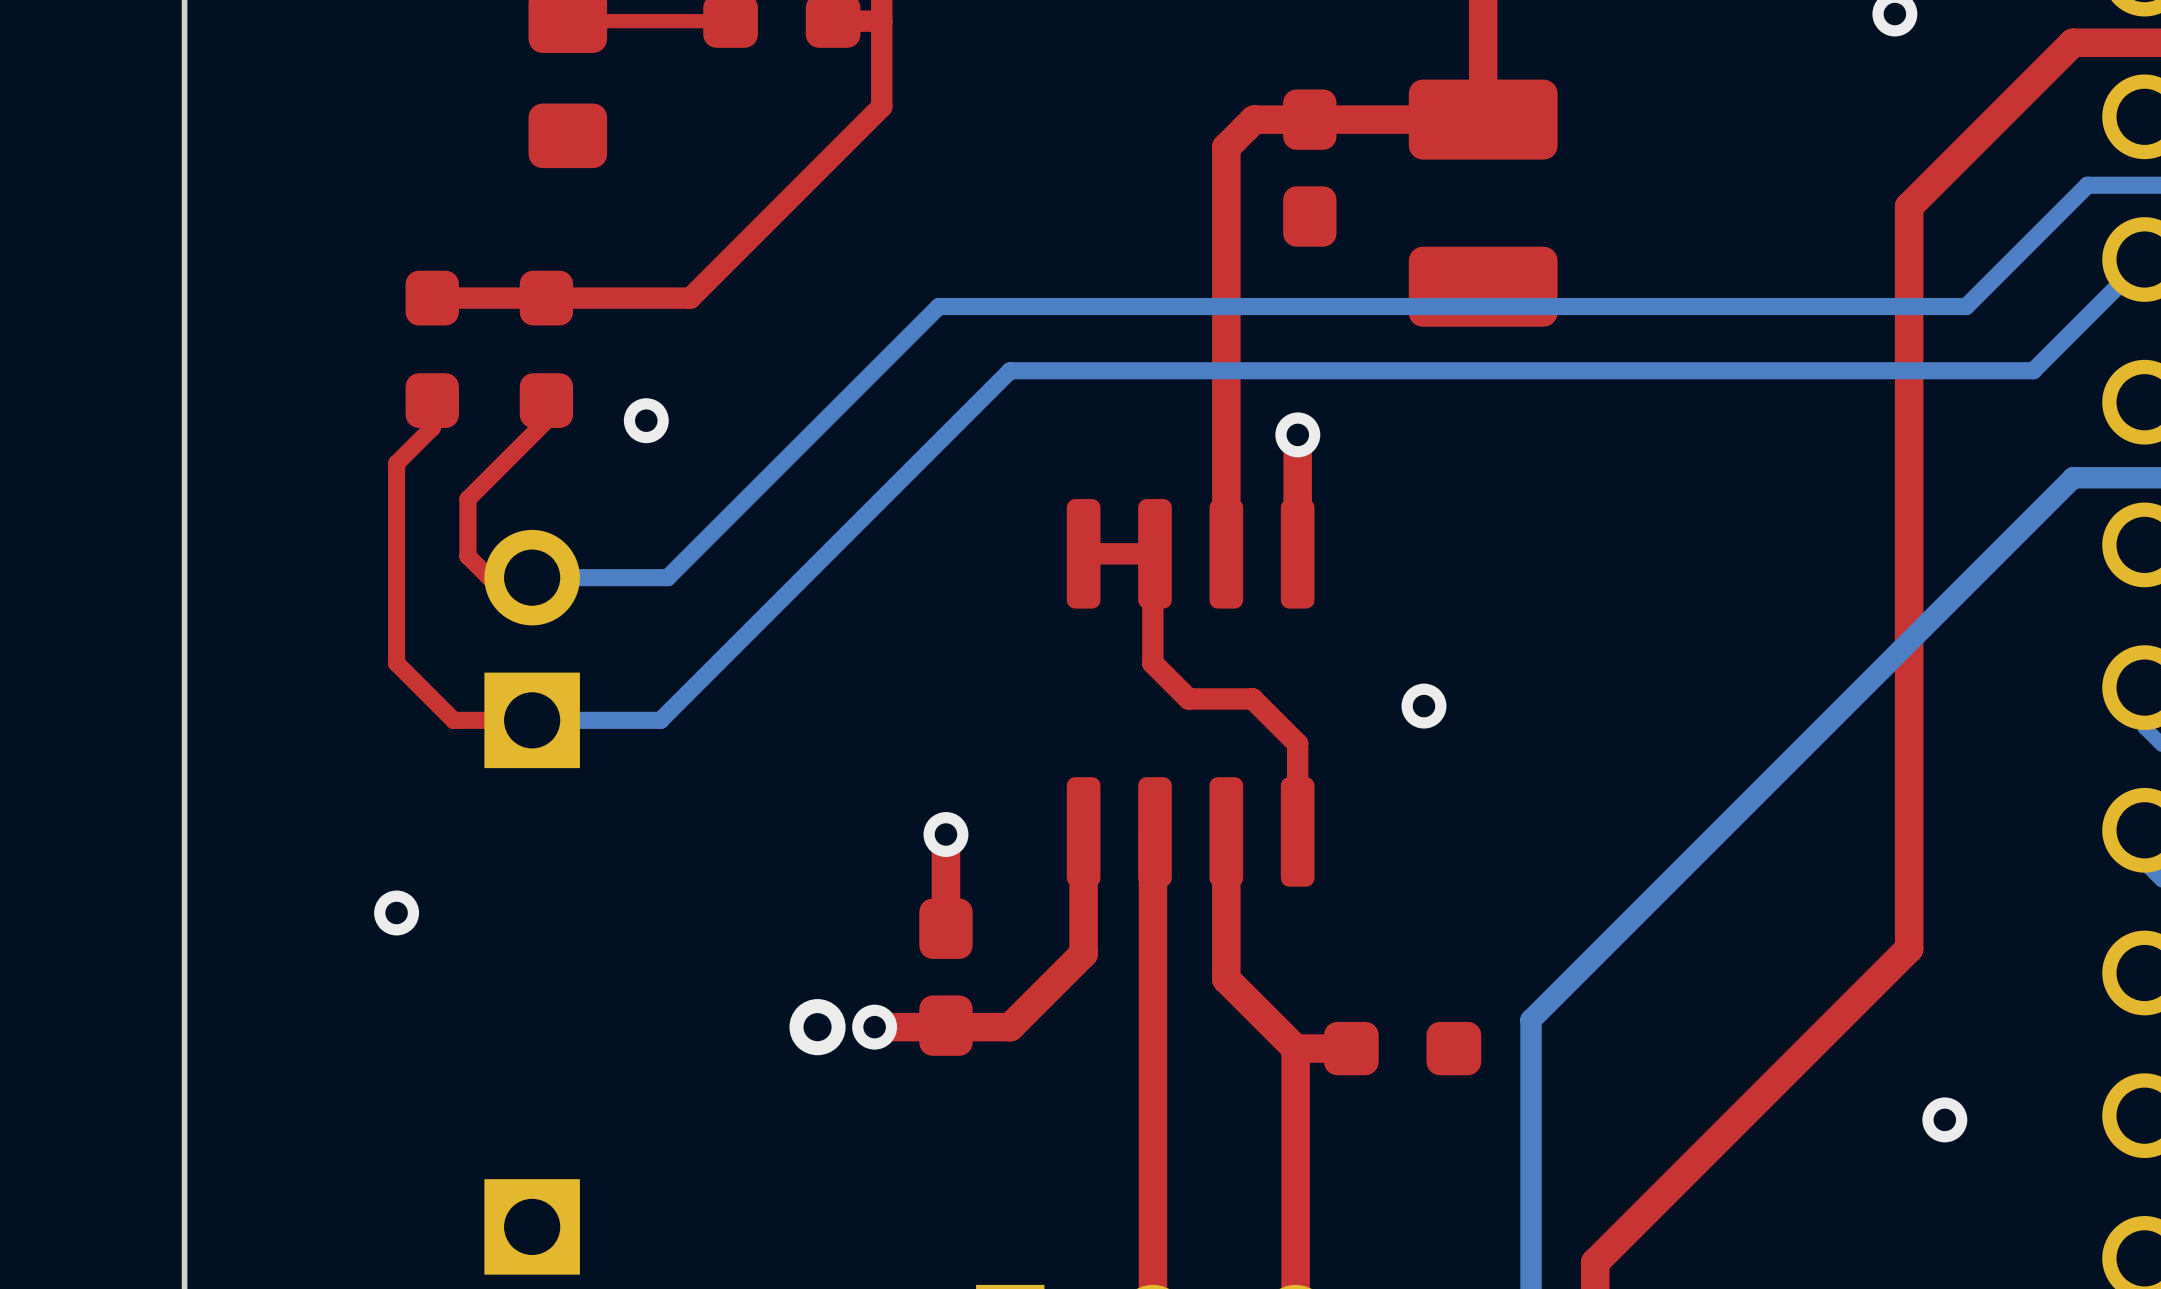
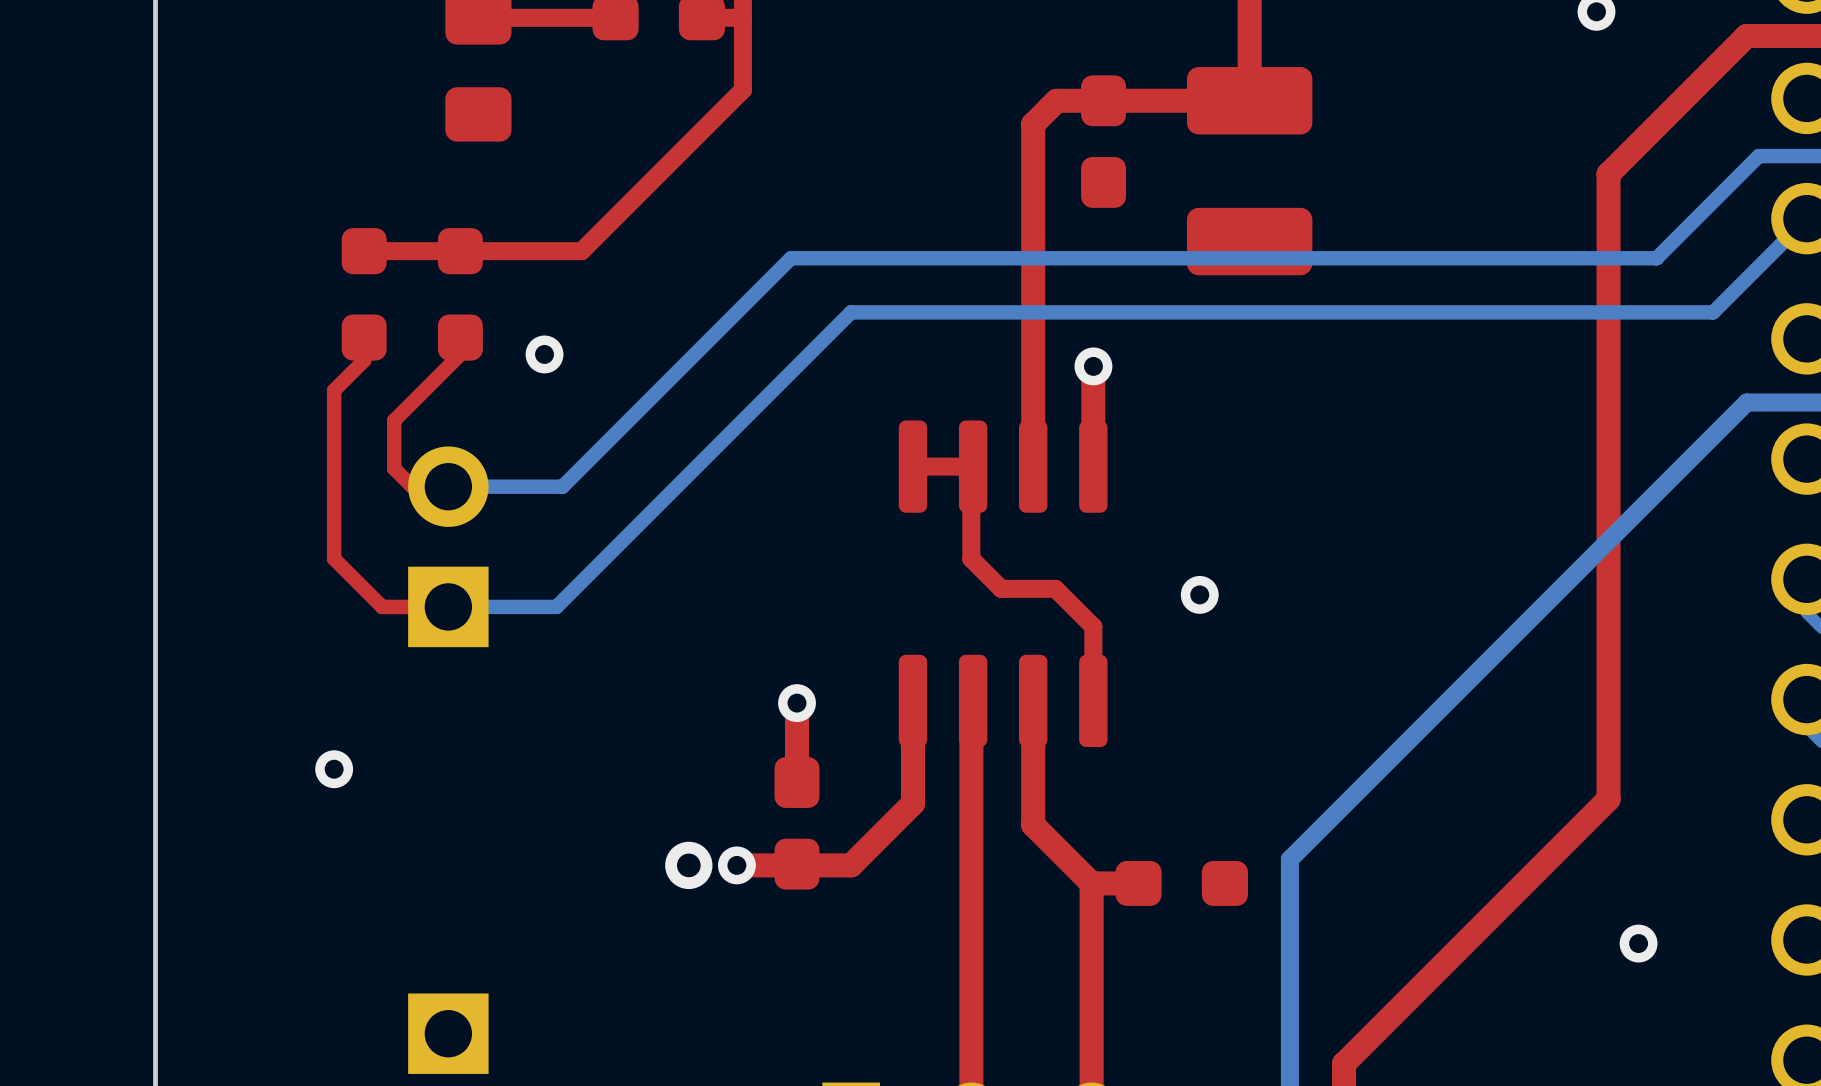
top track width: thin (730, 21) (568, 21) -> thick (615, 17) (478, 17)

